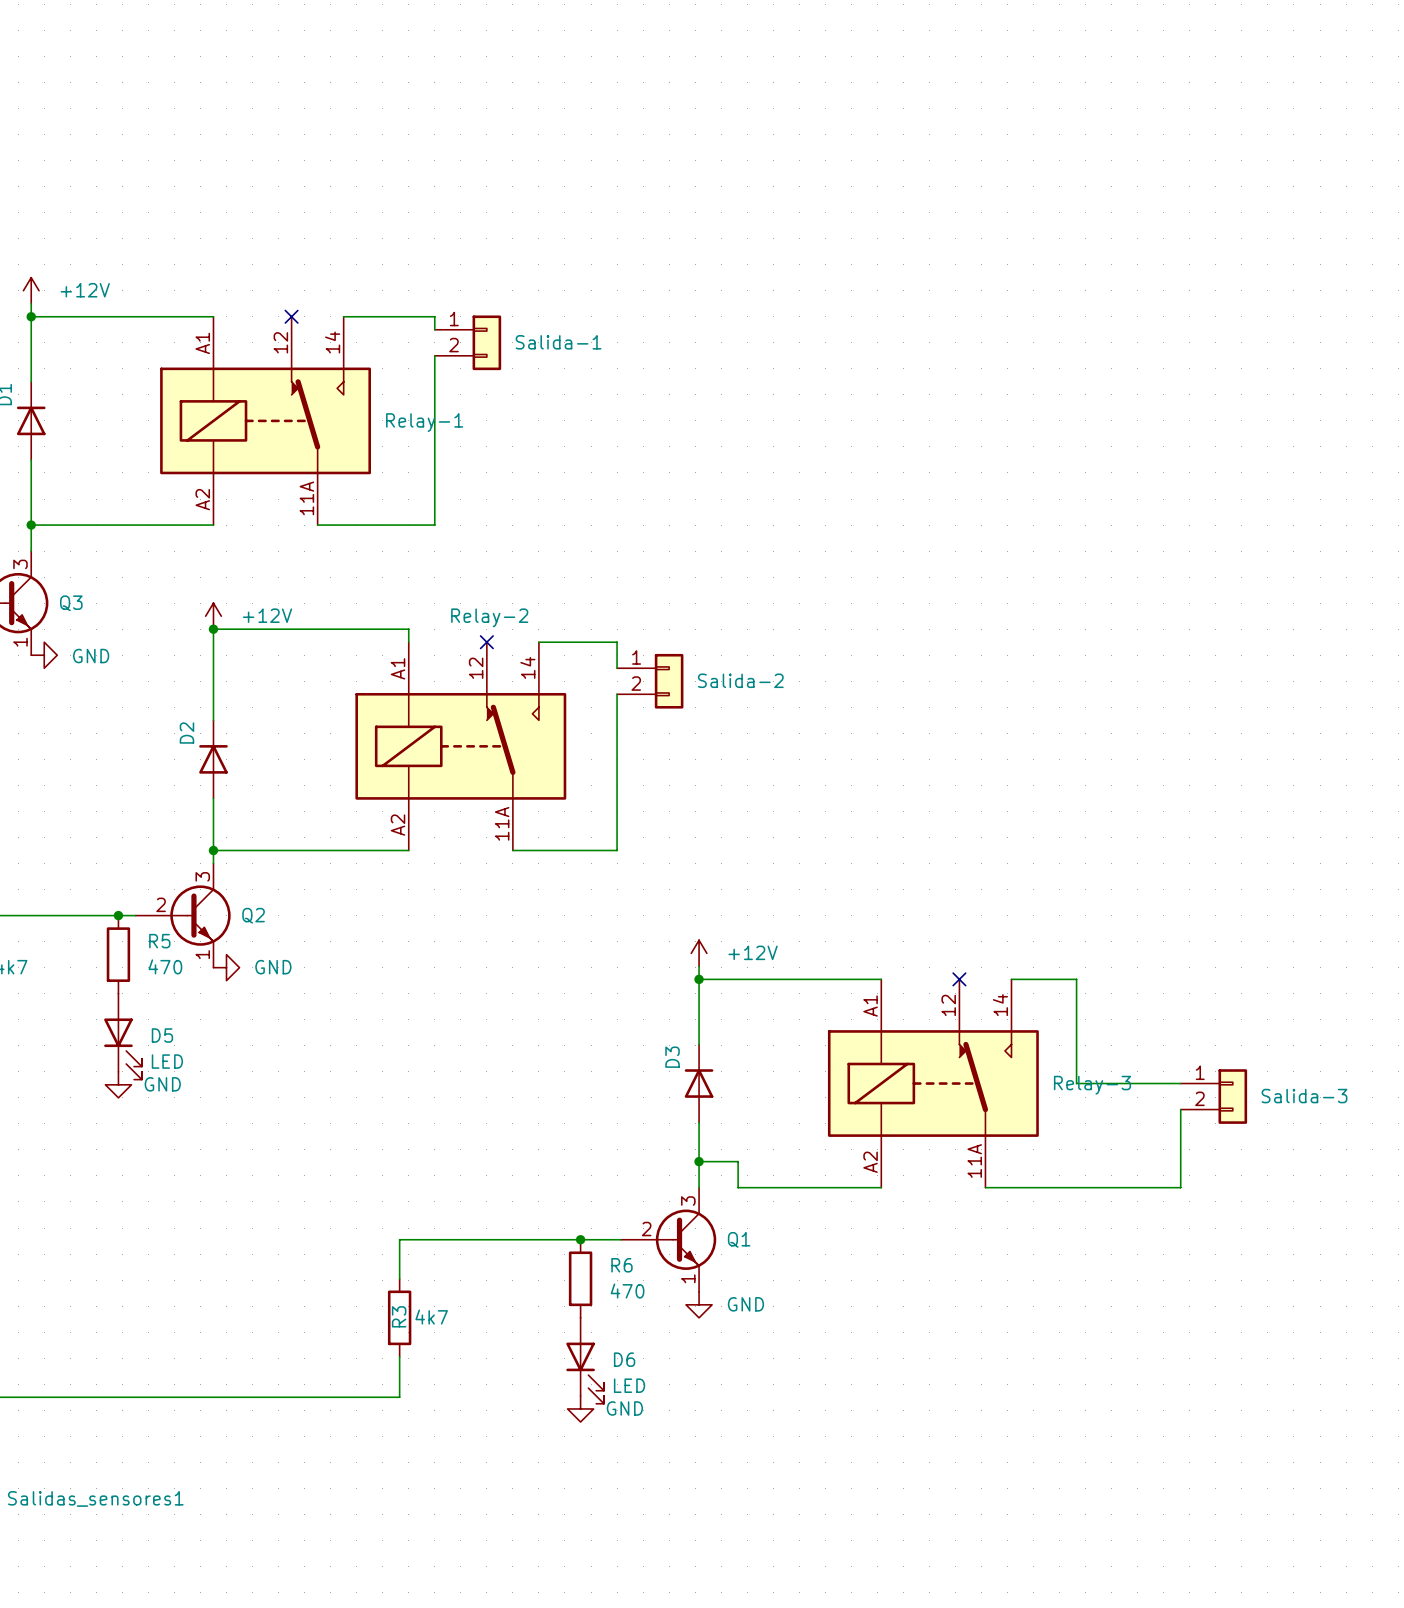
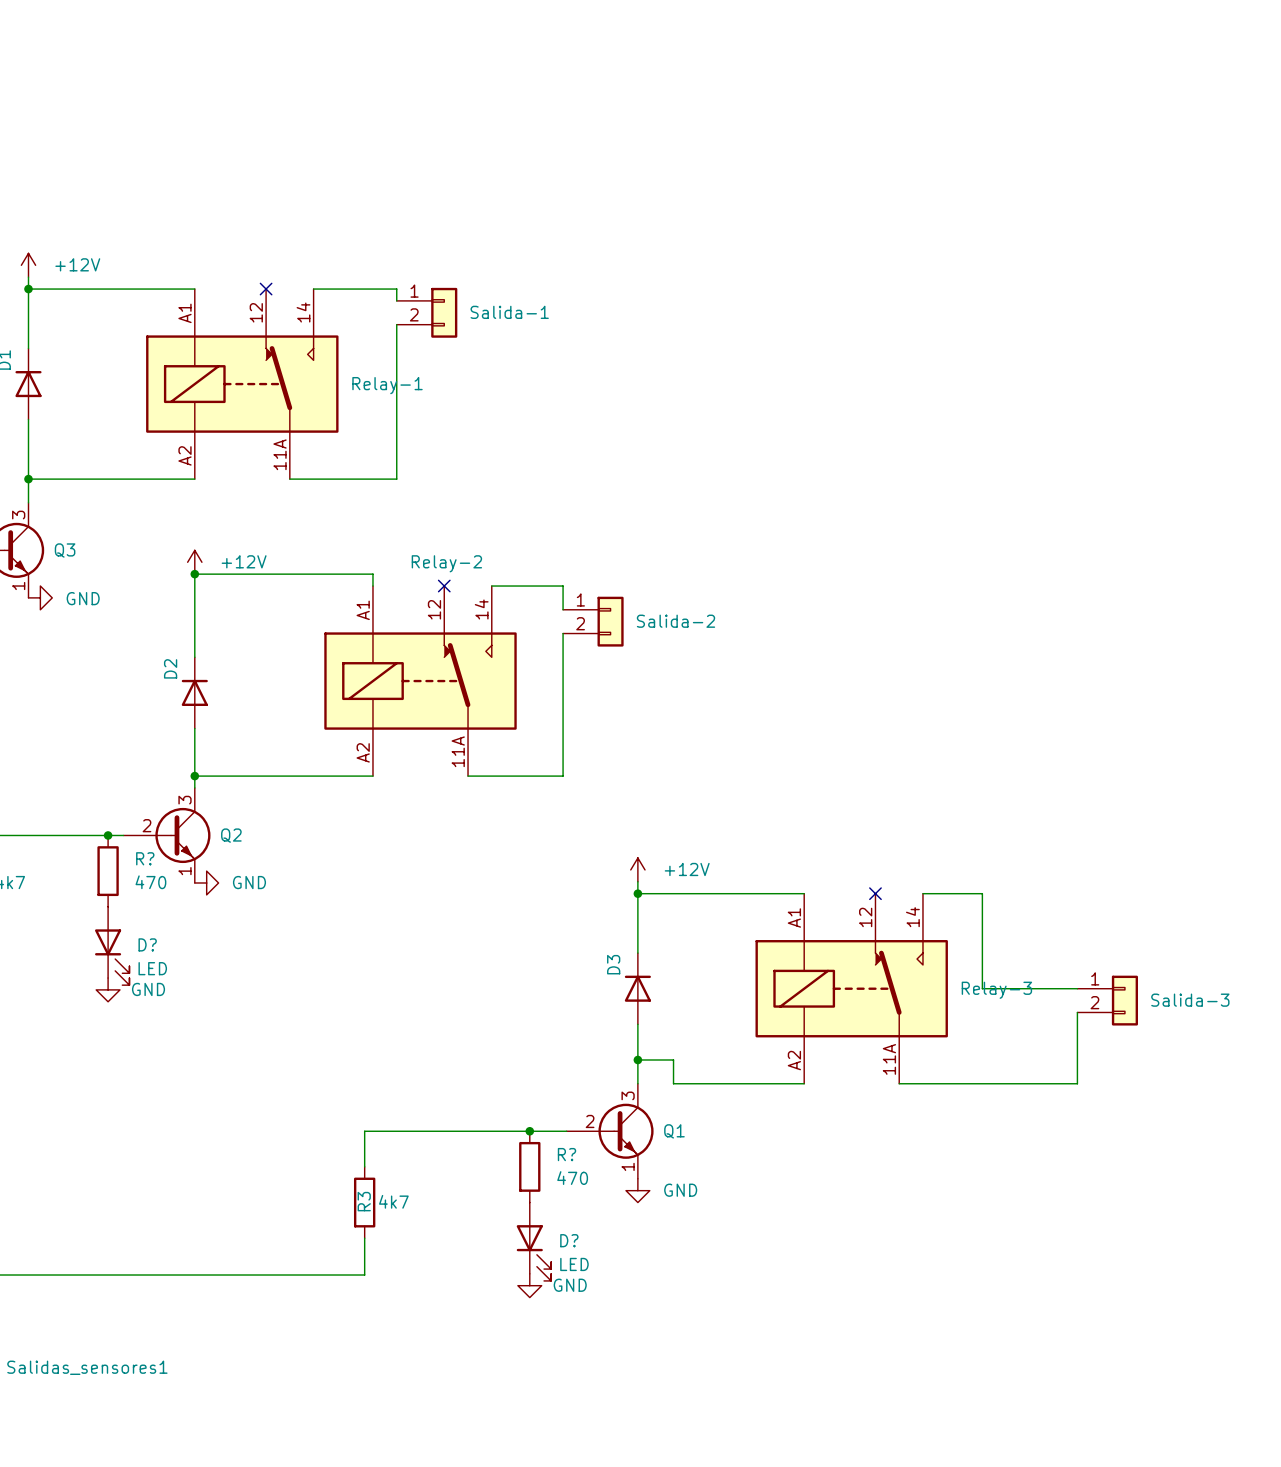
R5 name: R5 (159, 941) -> R? (145, 858)
D5 name: D5 (162, 1035) -> D? (147, 944)
R6 name: R6 (621, 1265) -> R? (566, 1154)
D6 name: D6 (624, 1359) -> D? (569, 1240)

